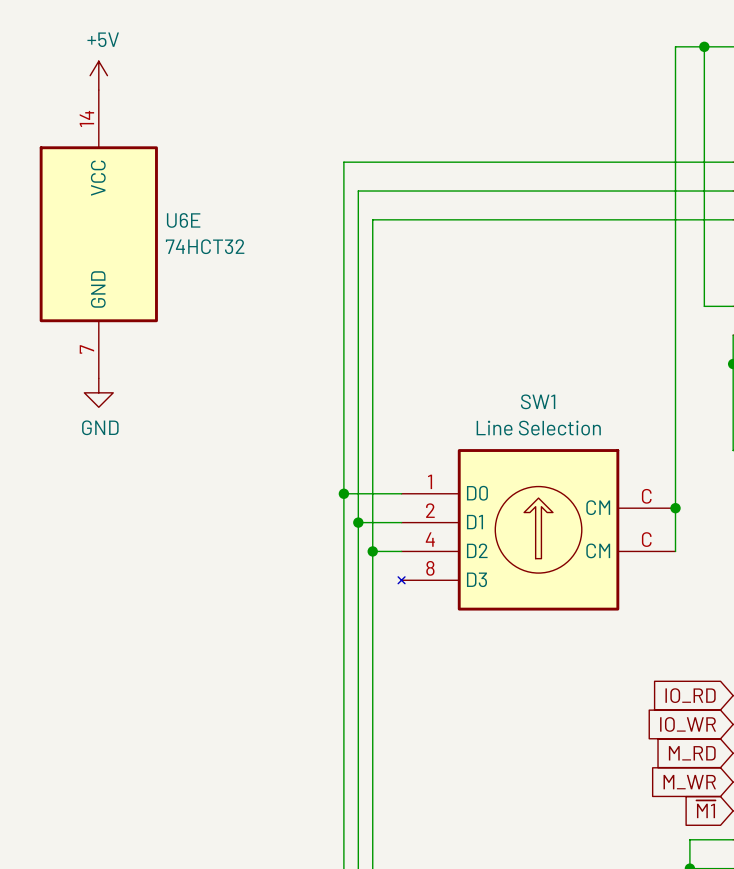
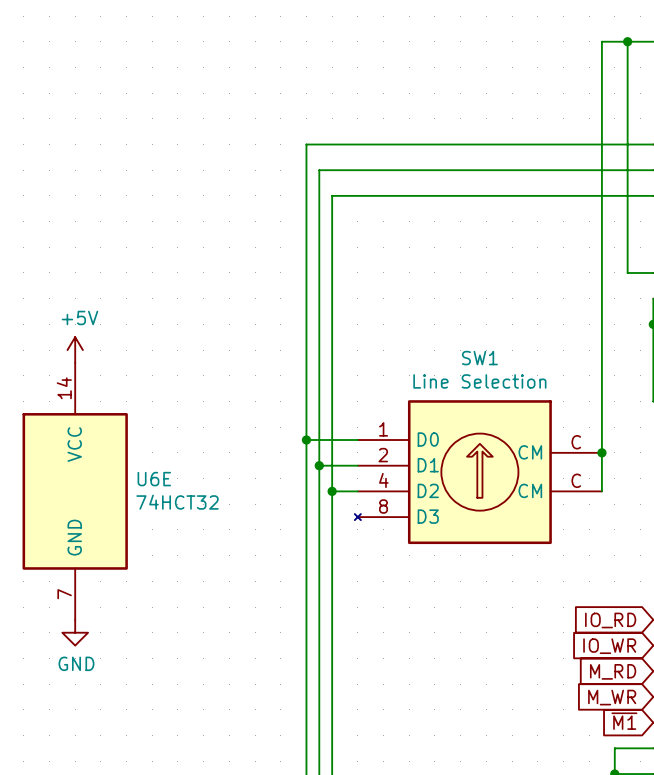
power symbol: +5V (98, 75) -> none
U6E position: (98, 234) -> (75, 491)
power symbol: none -> +5V (75, 350)
power symbol: GND (98, 392) -> none
power symbol: none -> GND (75, 632)

